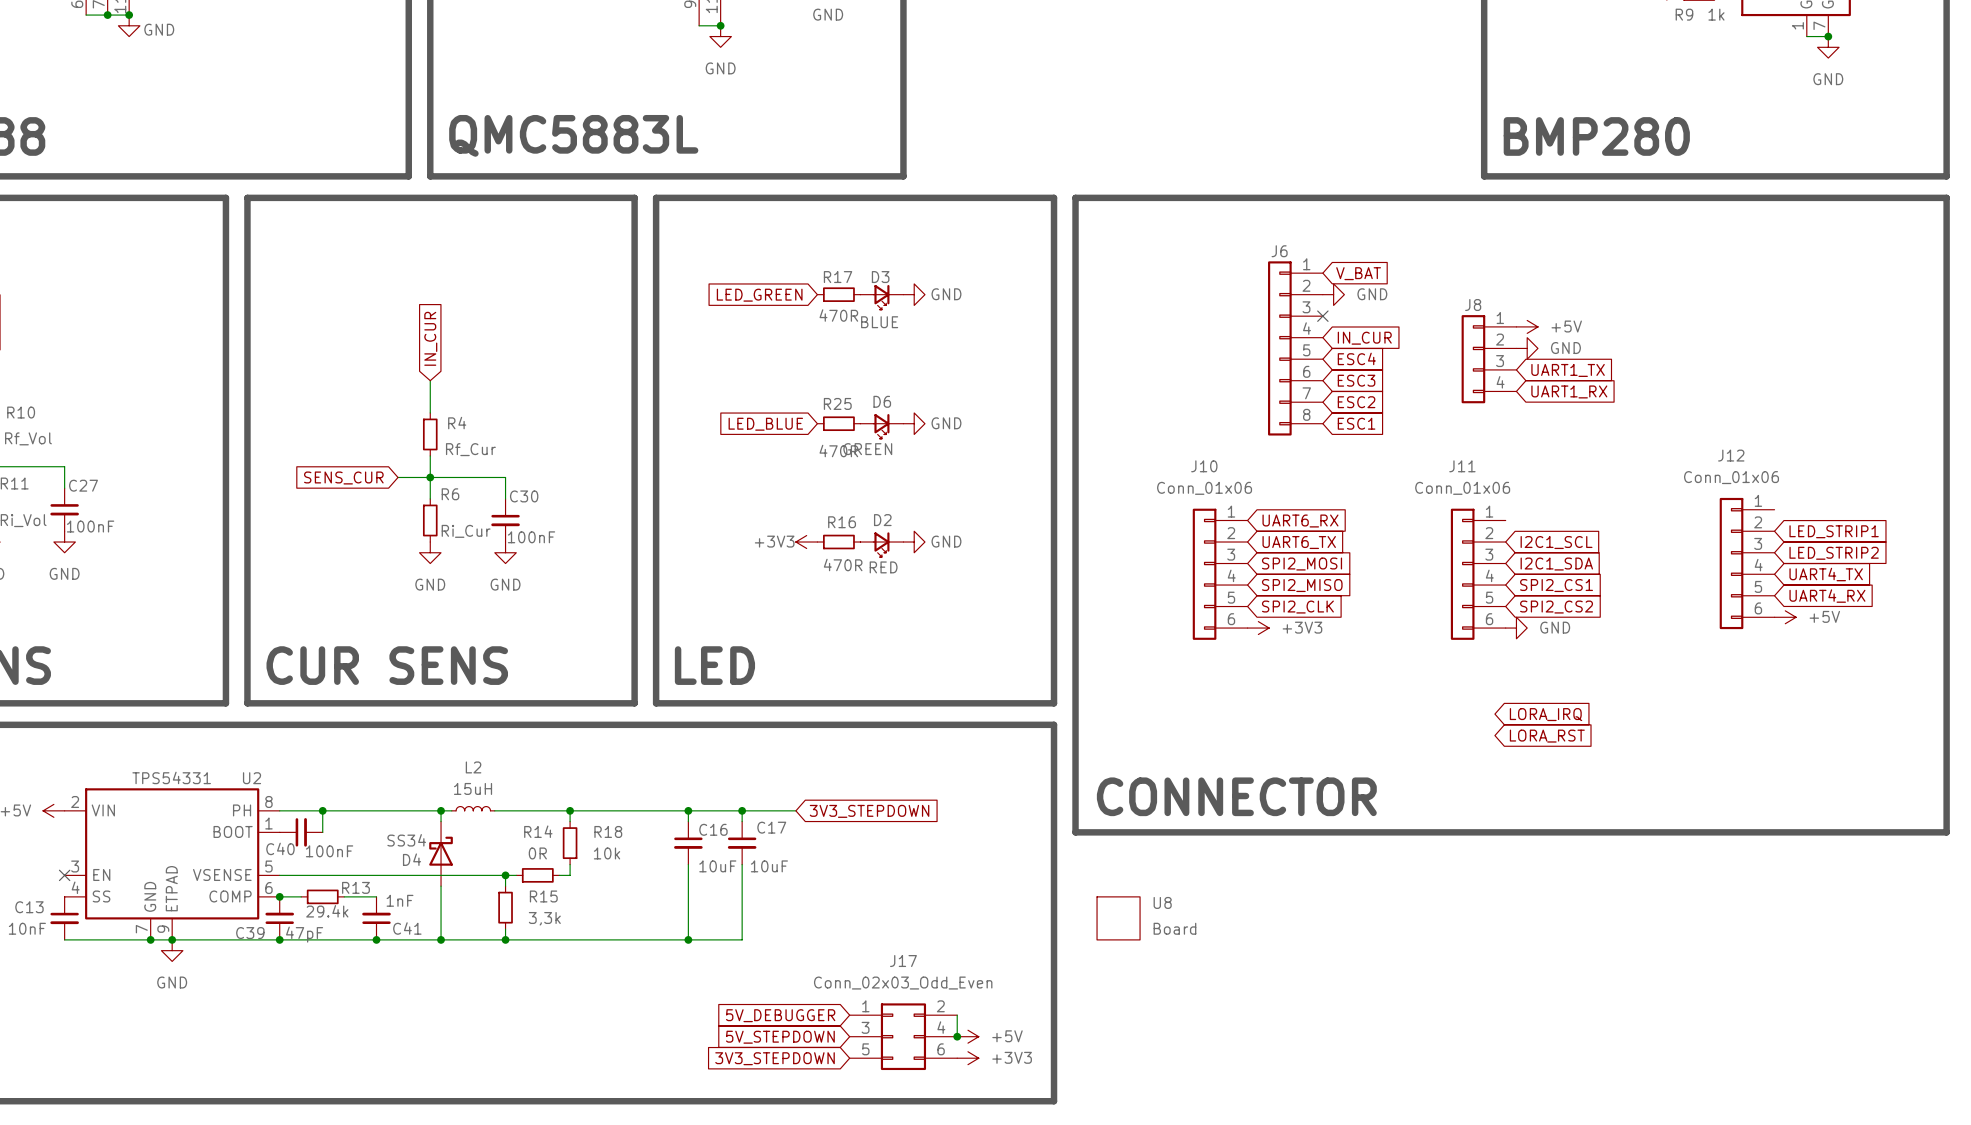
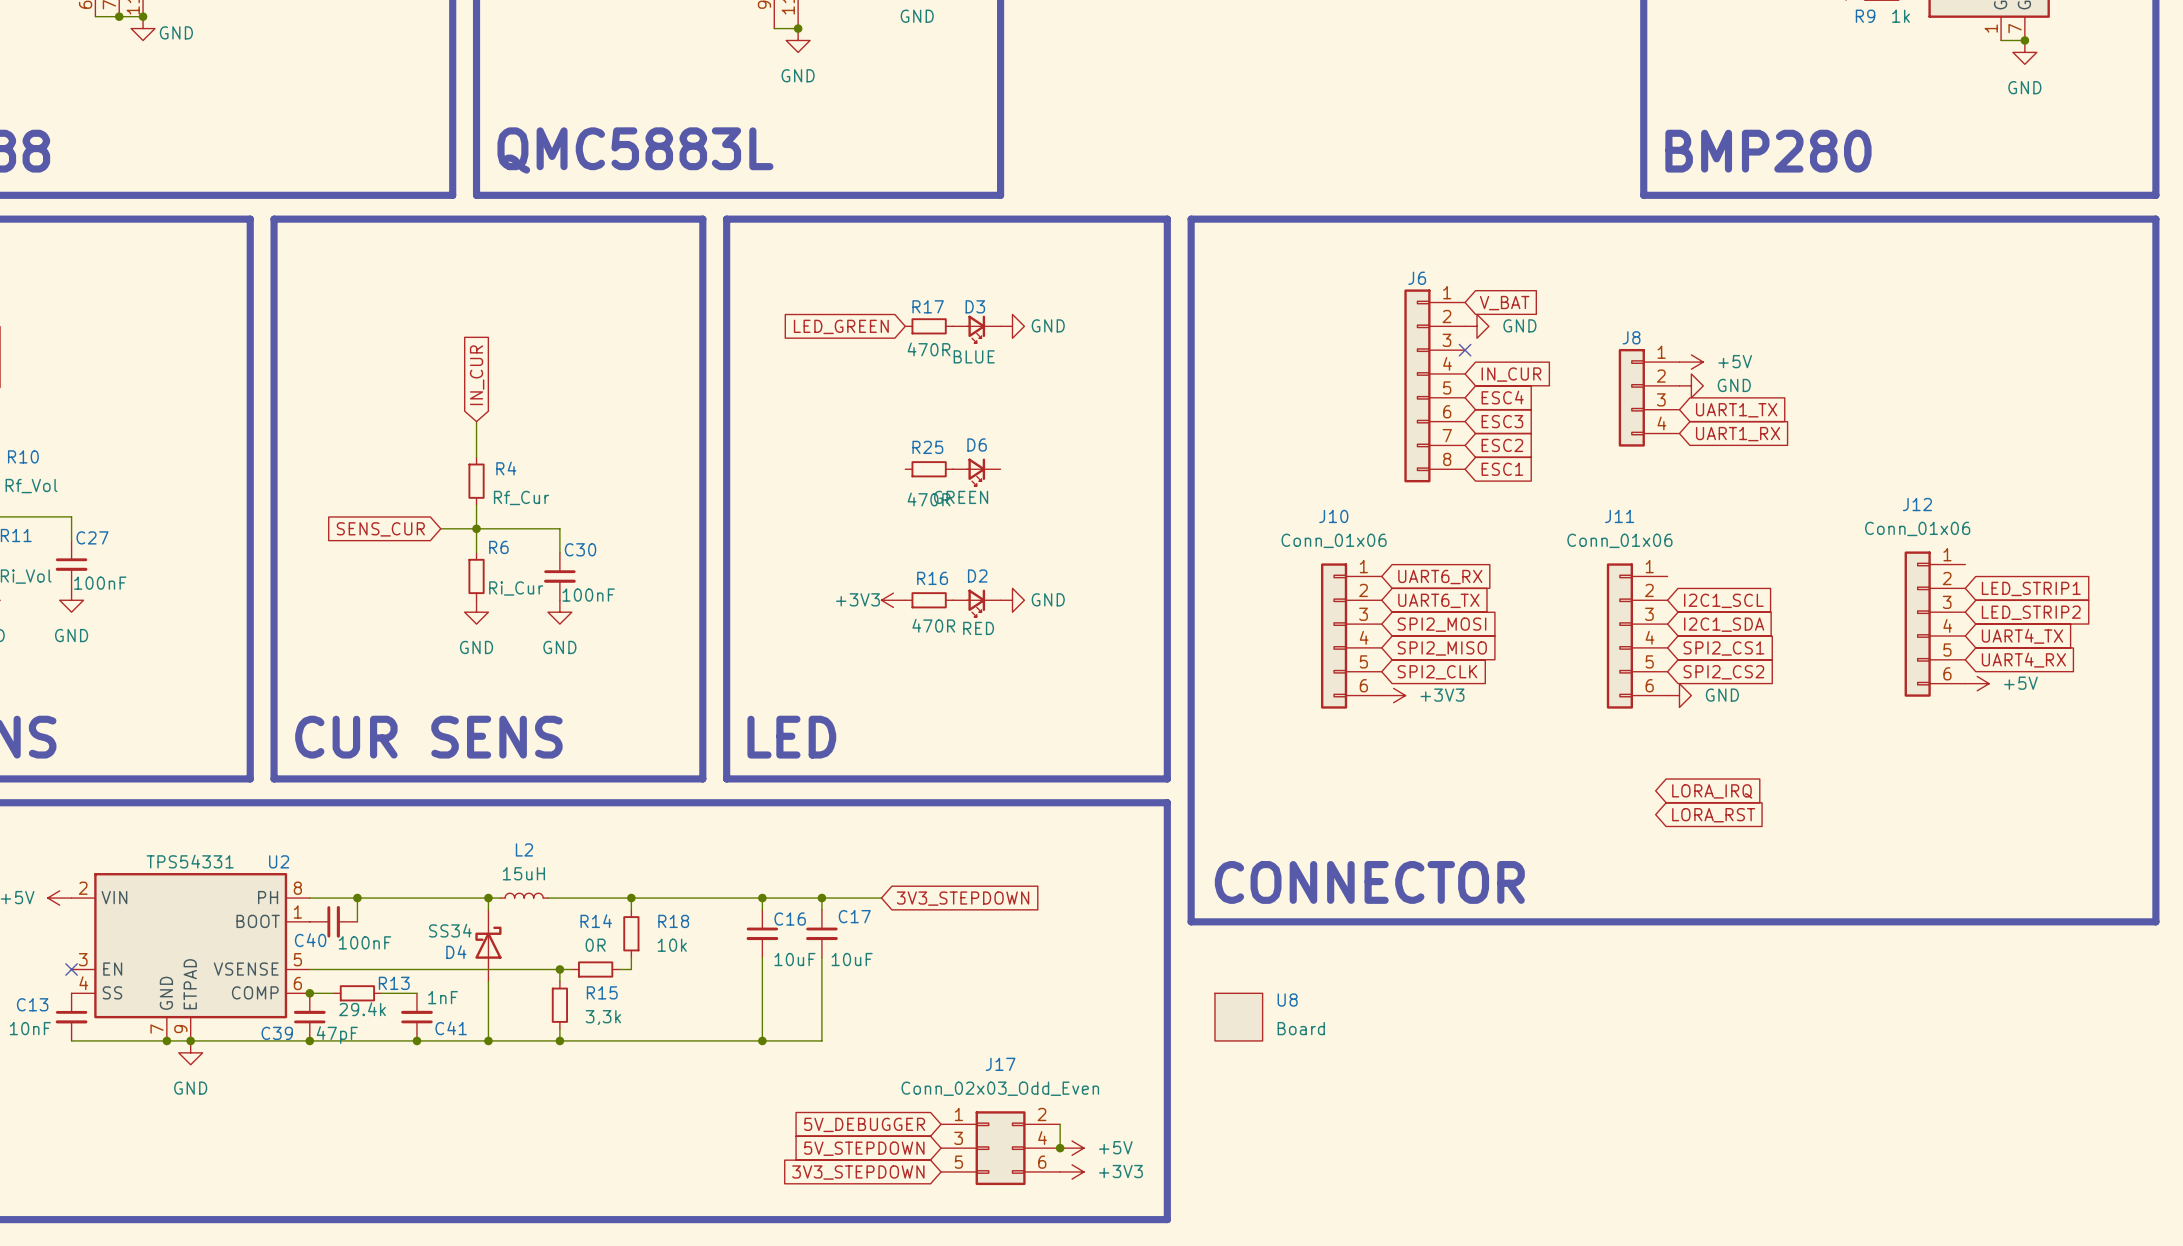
power symbol: GND (914, 423) -> none
global label: LED_BLUE (765, 424) -> none

